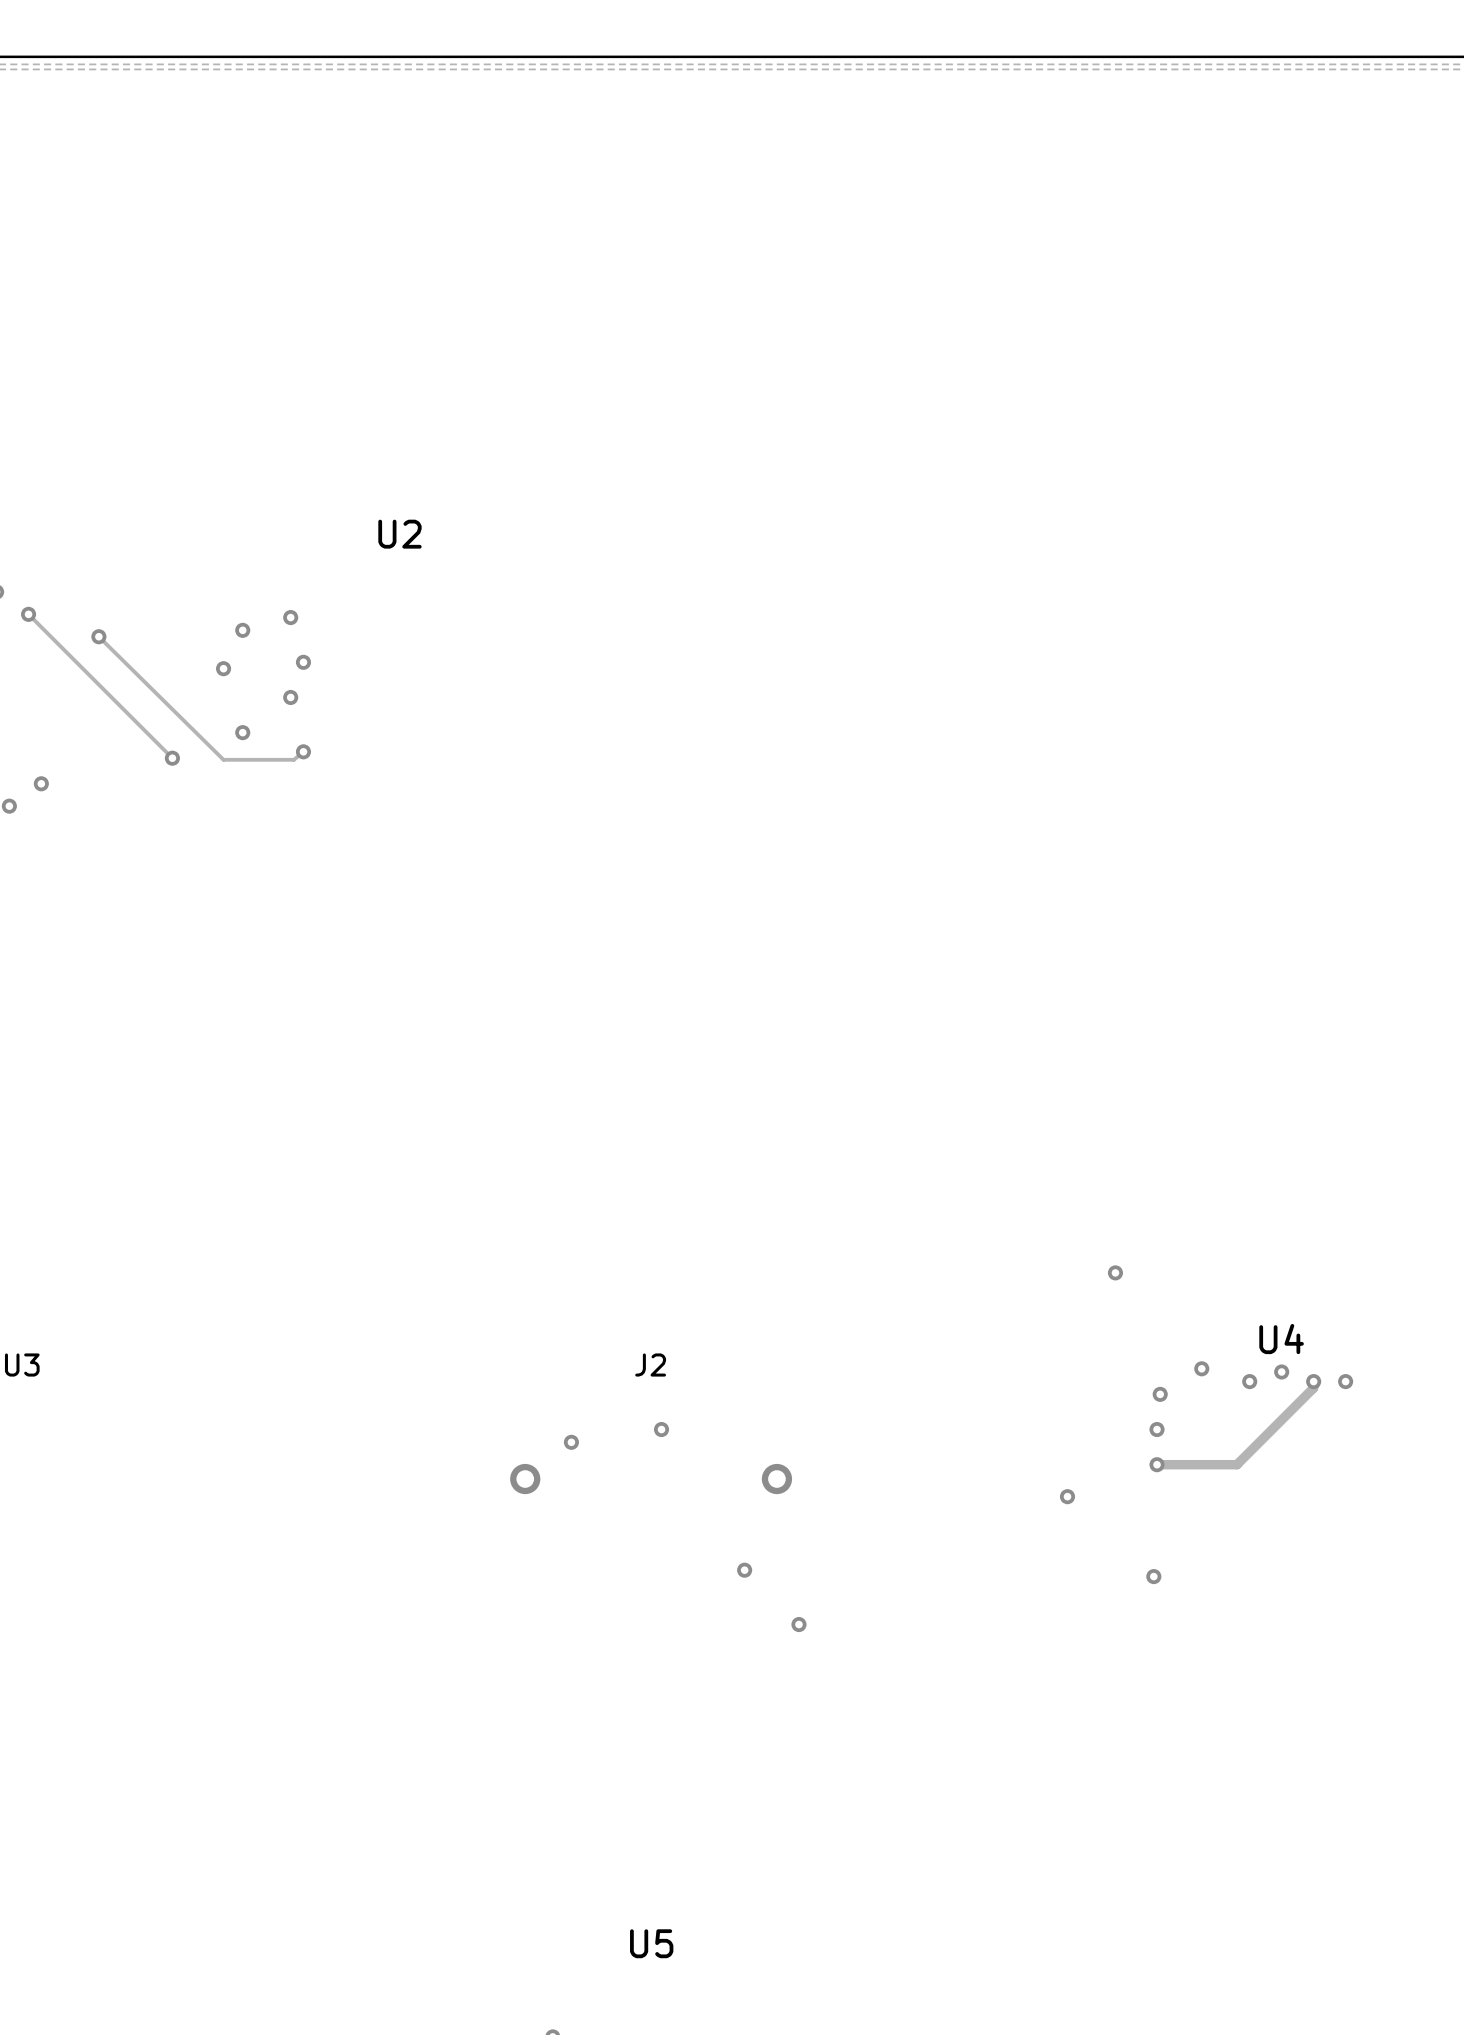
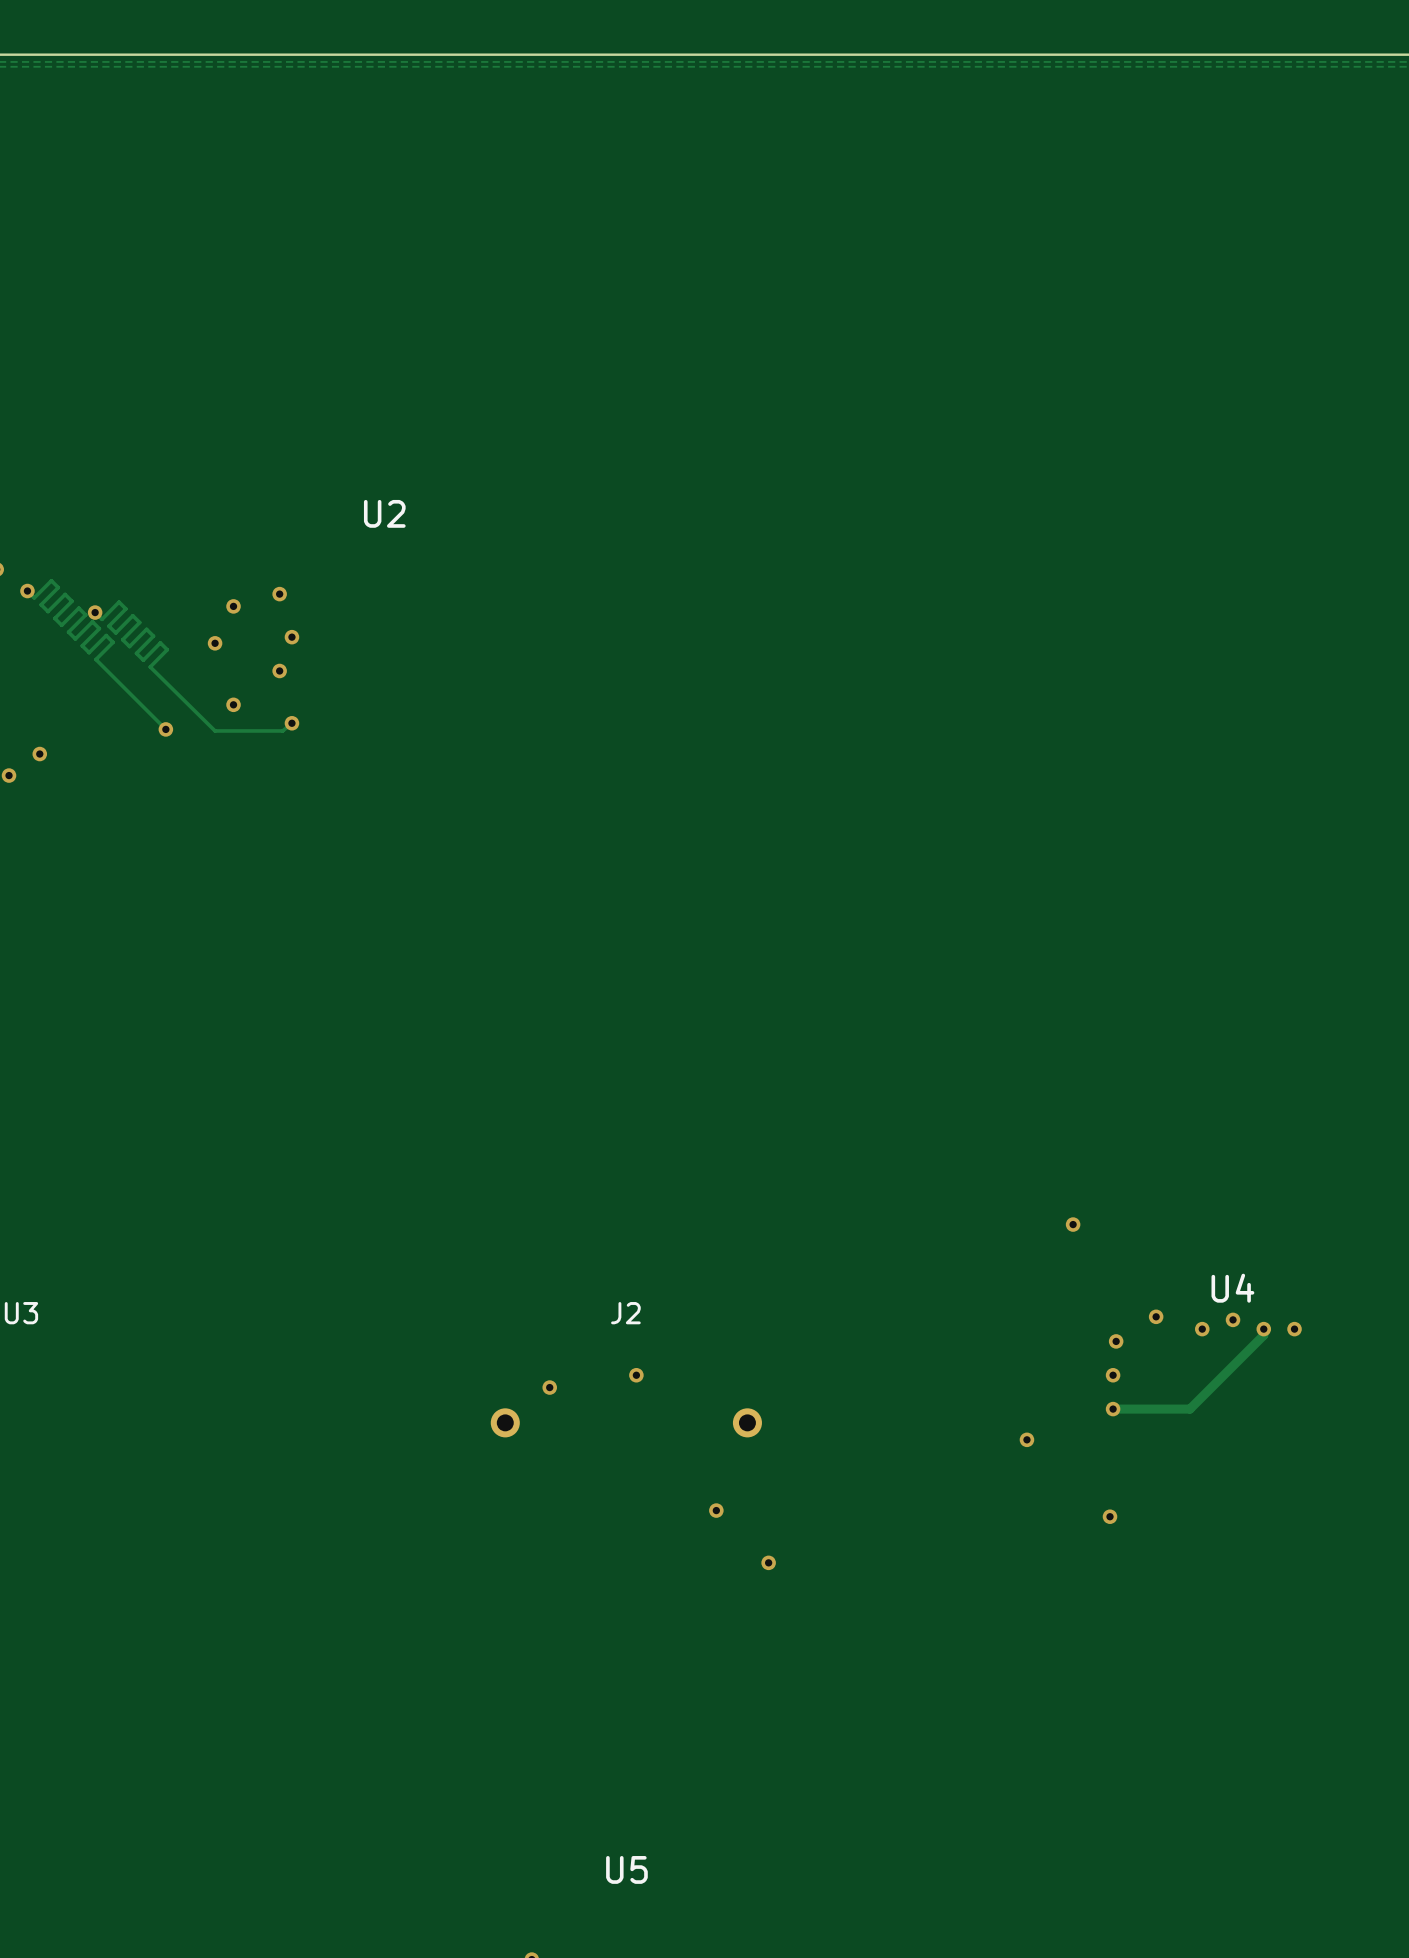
track: (35, 621) (42, 628) -> (34, 597) (51, 580) (58, 587) (41, 604)
track: (49, 635) (57, 642) -> (48, 611) (65, 594) (71, 601) (54, 618)
track: (98, 636) (156, 693) -> (95, 612) (102, 619) (119, 602) (125, 608) (108, 626) (115, 632) (132, 615) (139, 622) (122, 639) (129, 646) (146, 629) (153, 636) (136, 653) (143, 660) (160, 642) (167, 649) (150, 667)
track: (64, 649) (71, 657) -> (61, 625) (78, 608) (85, 615) (68, 632)
track: (78, 664) (85, 671) -> (75, 638) (92, 621) (99, 628) (82, 645)
track: (92, 678) (99, 685) -> (89, 652) (106, 635) (113, 642) (95, 659)

